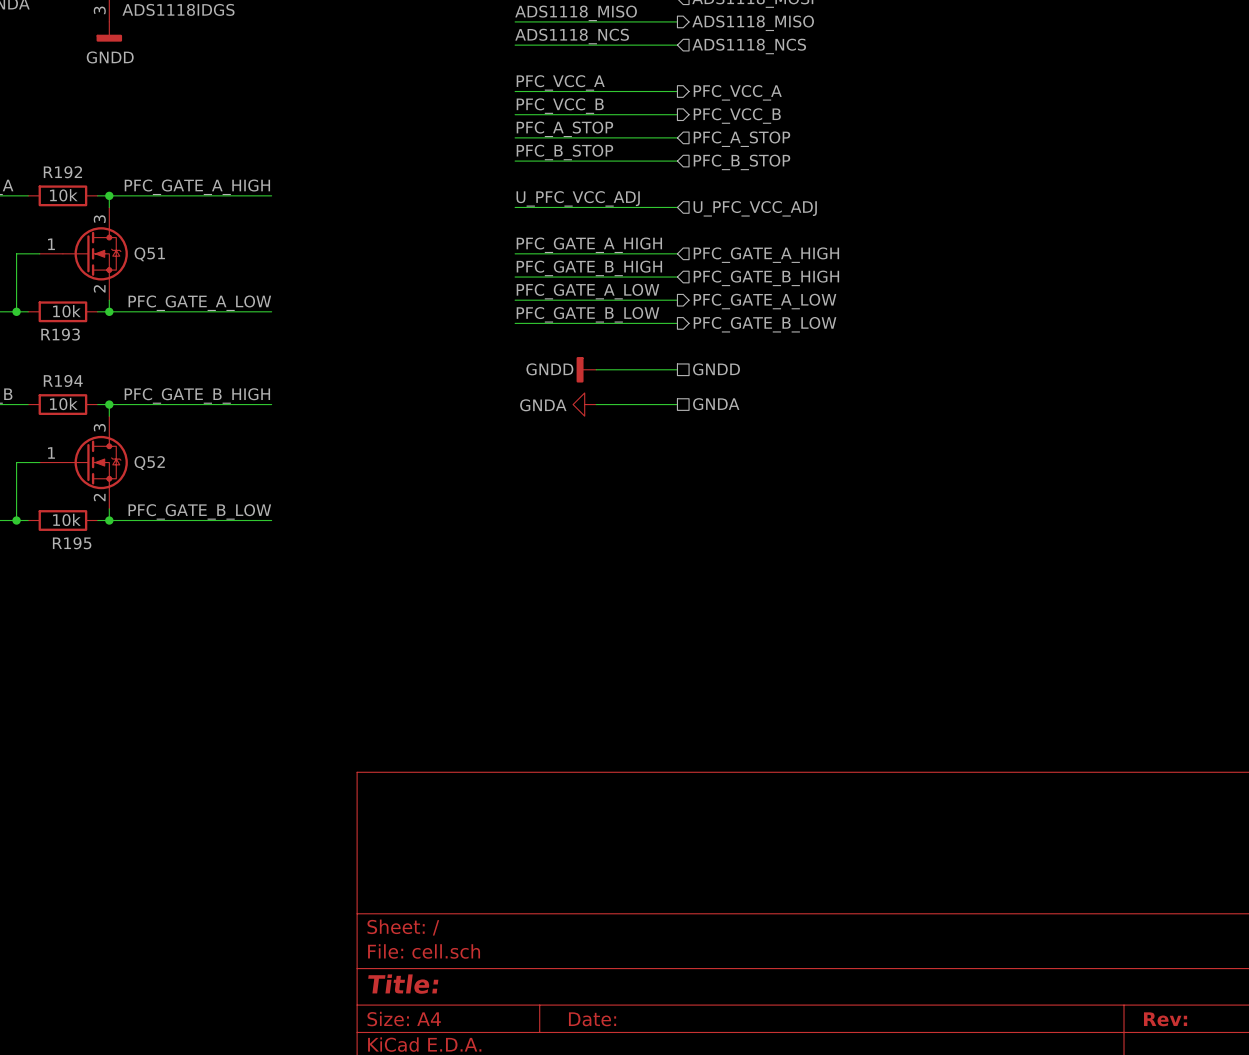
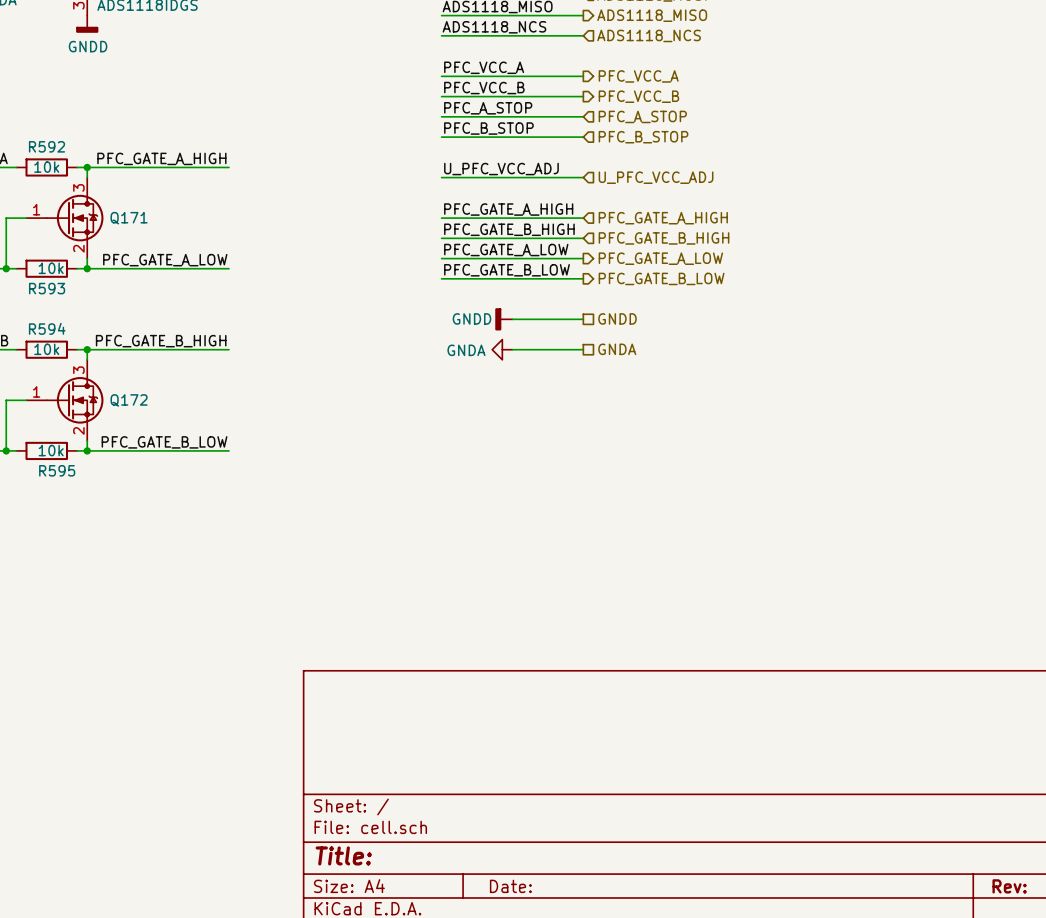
R192 name: R192 (62, 172) -> R592 (46, 146)
Q51 name: Q51 (149, 254) -> Q171 (129, 218)
R193 name: R193 (60, 334) -> R593 (47, 288)
R194 name: R194 (63, 380) -> R594 (47, 328)
Q52 name: Q52 (149, 463) -> Q172 (129, 400)
R195 name: R195 (72, 543) -> R595 (57, 470)

